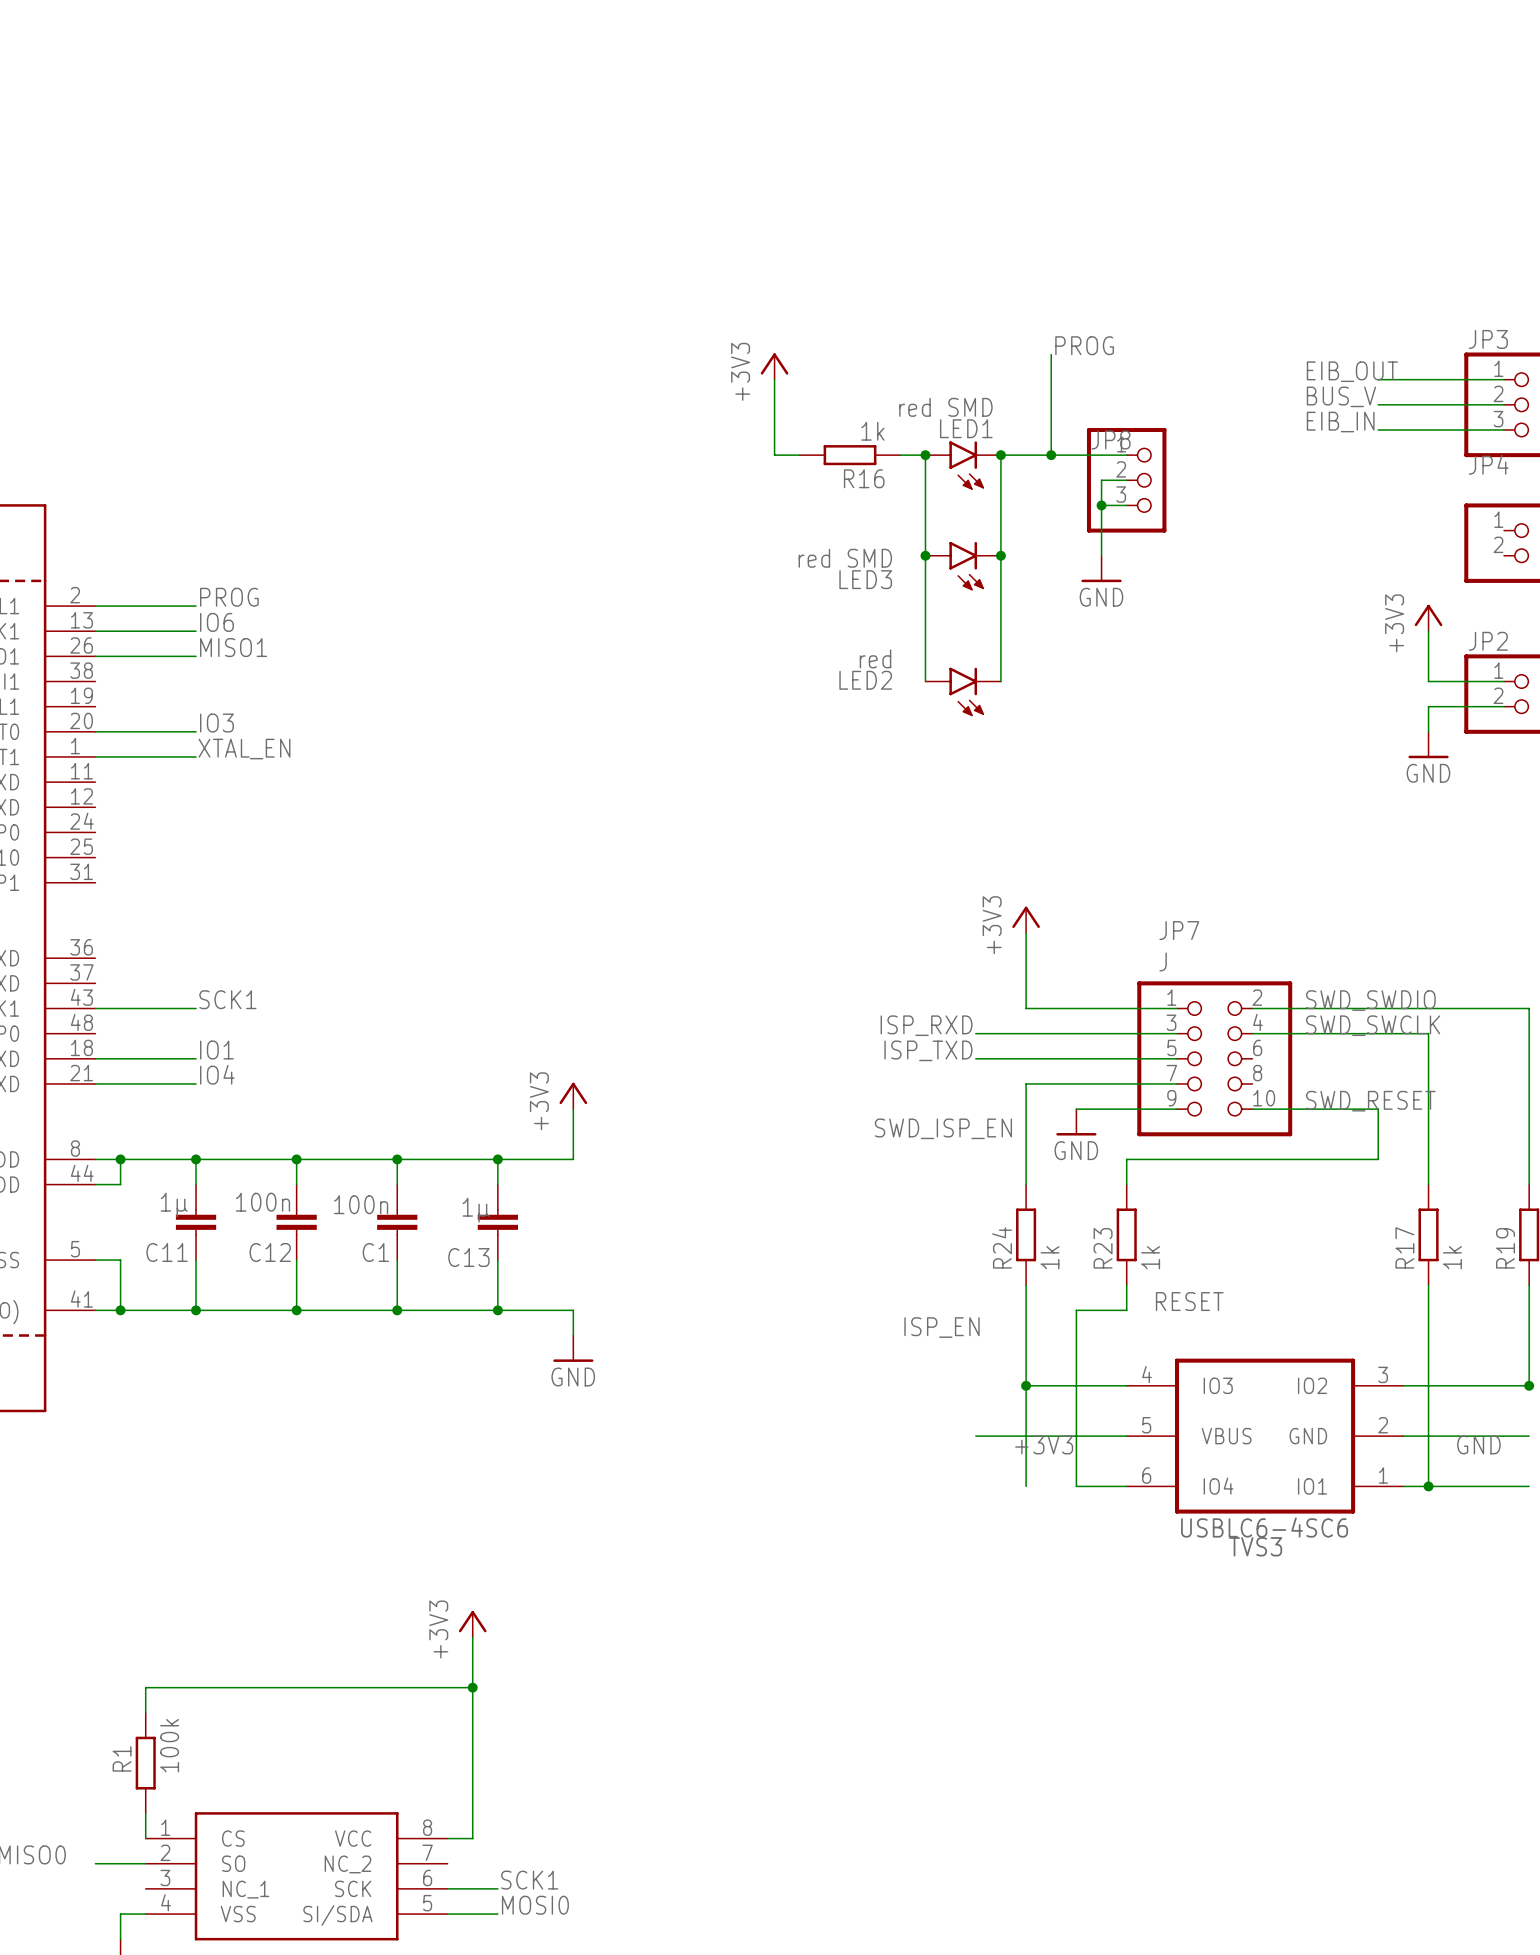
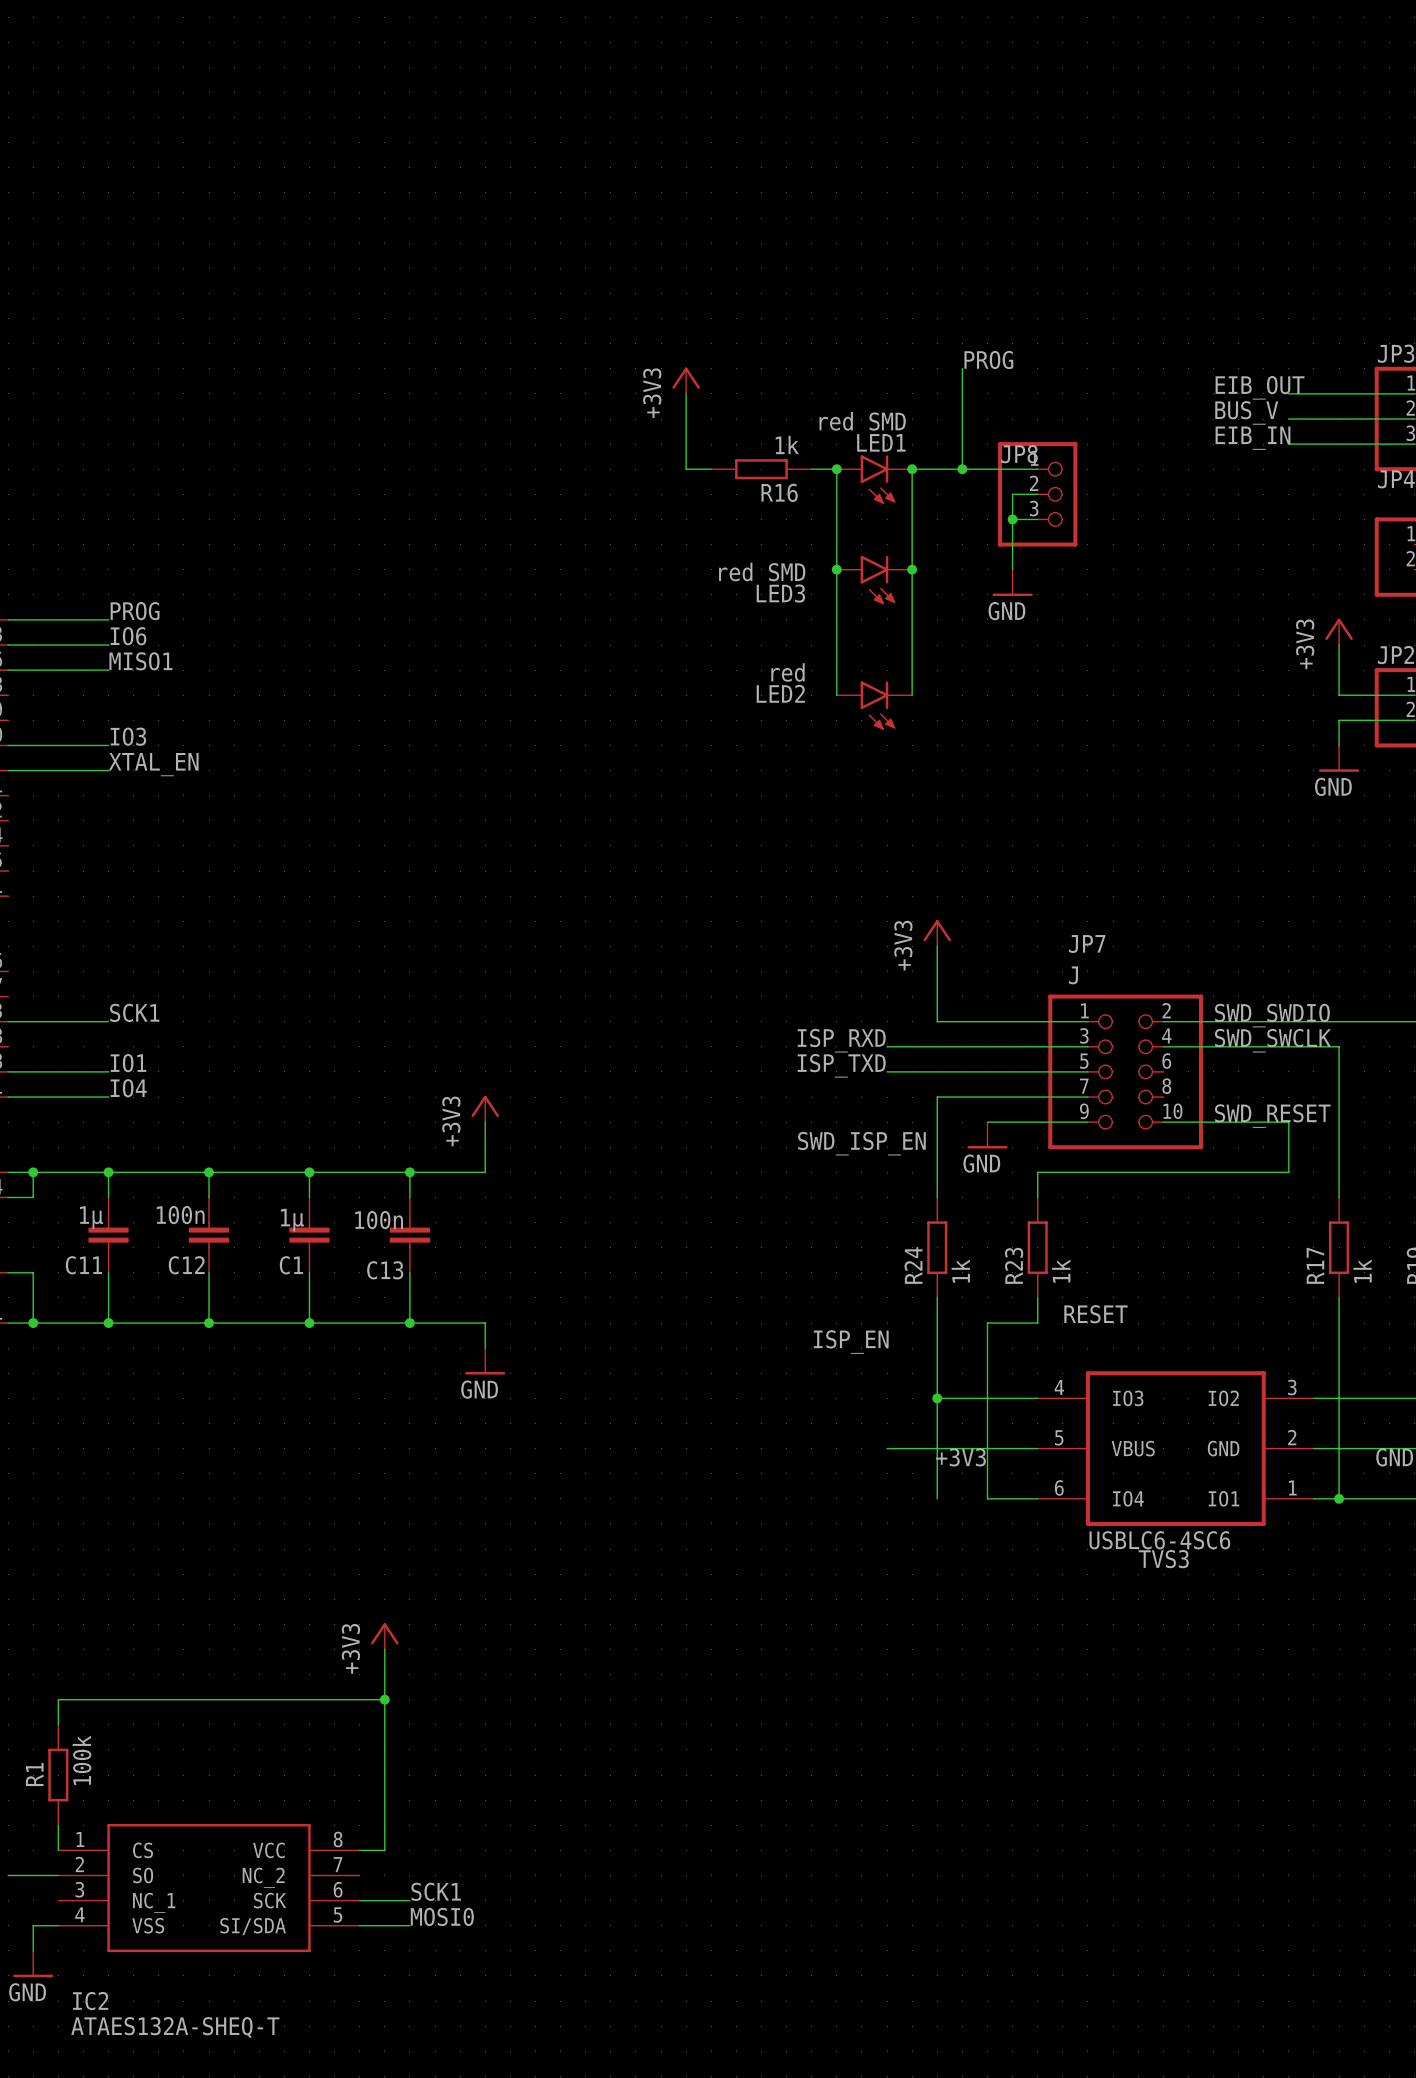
C1 value: 100n (361, 1204) -> 1µ (292, 1220)
C13 value: 1µ (476, 1210) -> 100n (379, 1220)

